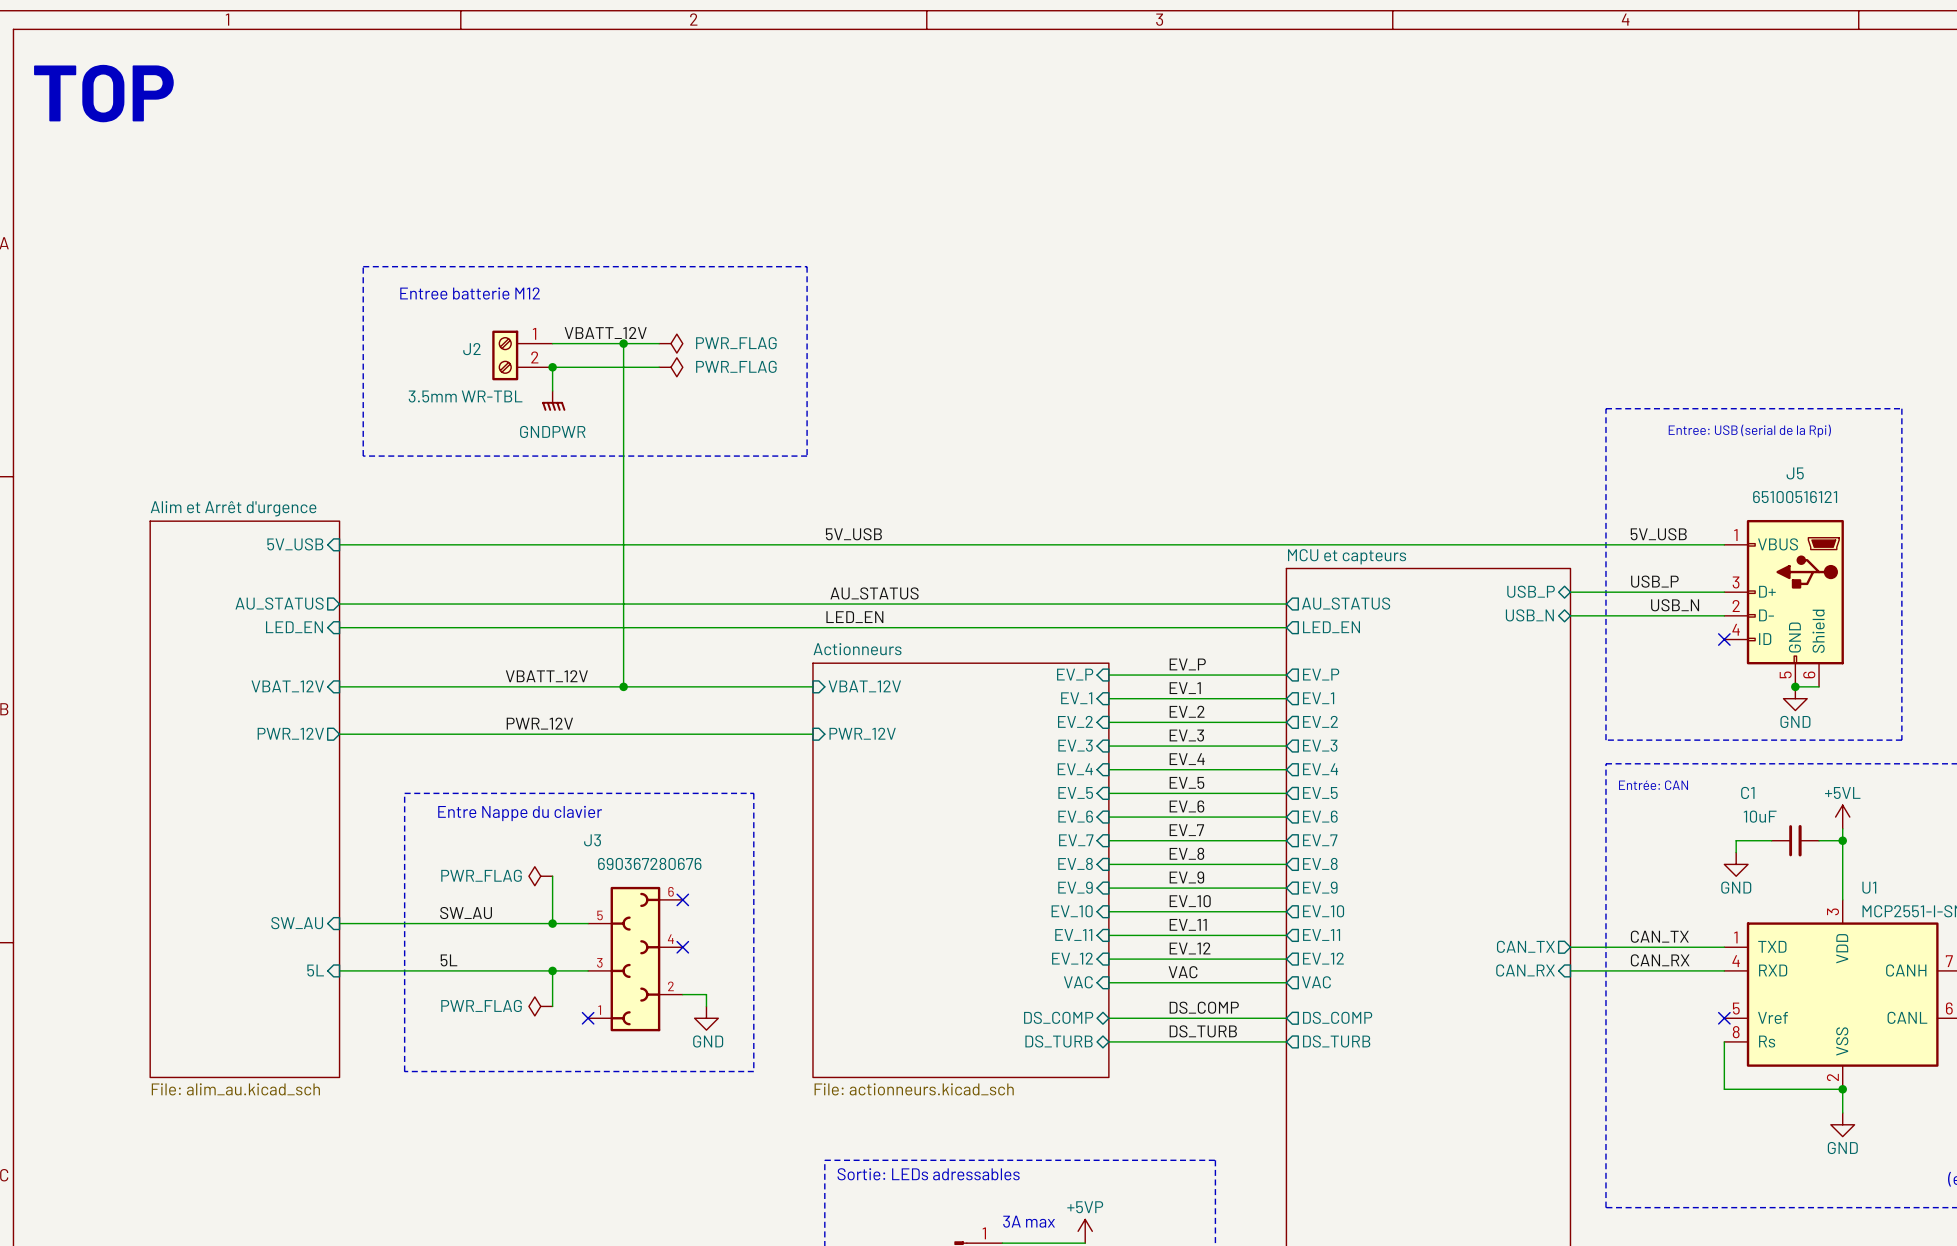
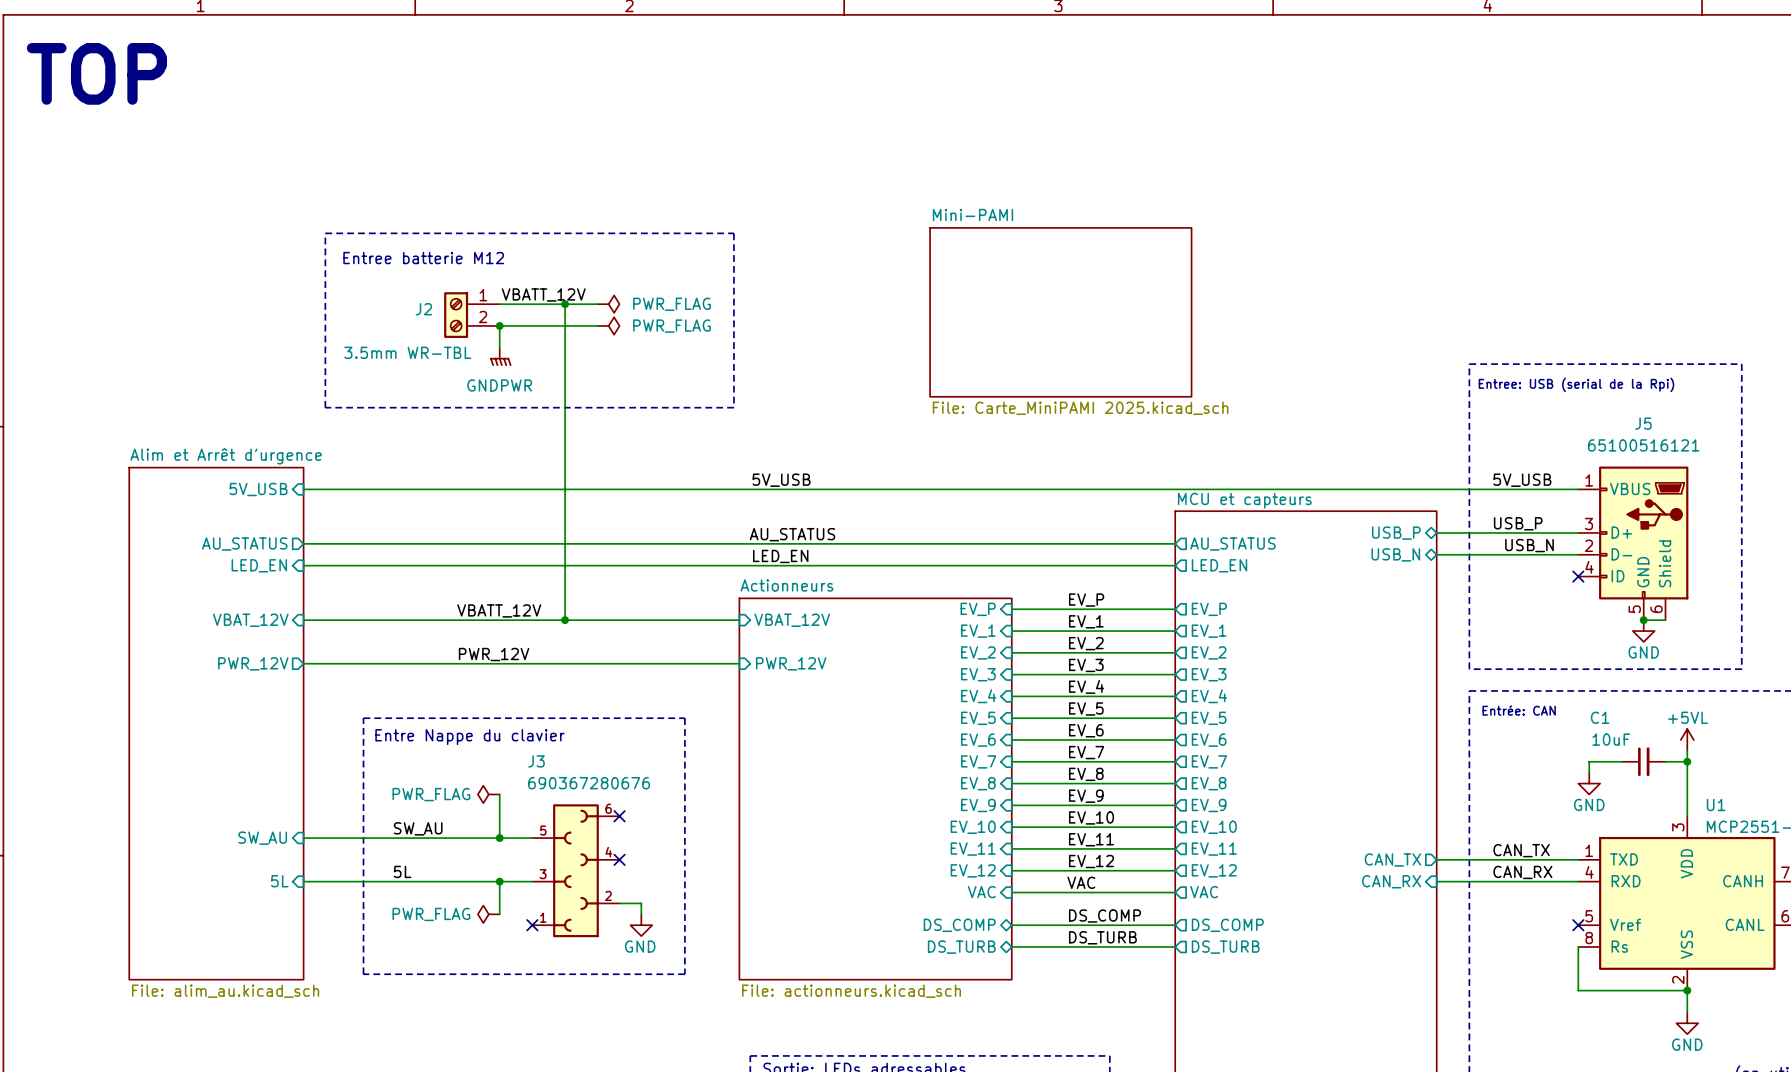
sheet Mini-PAMI: none -> File: Carte_MiniPAMI 2025.kicad_sch (1060, 312)

